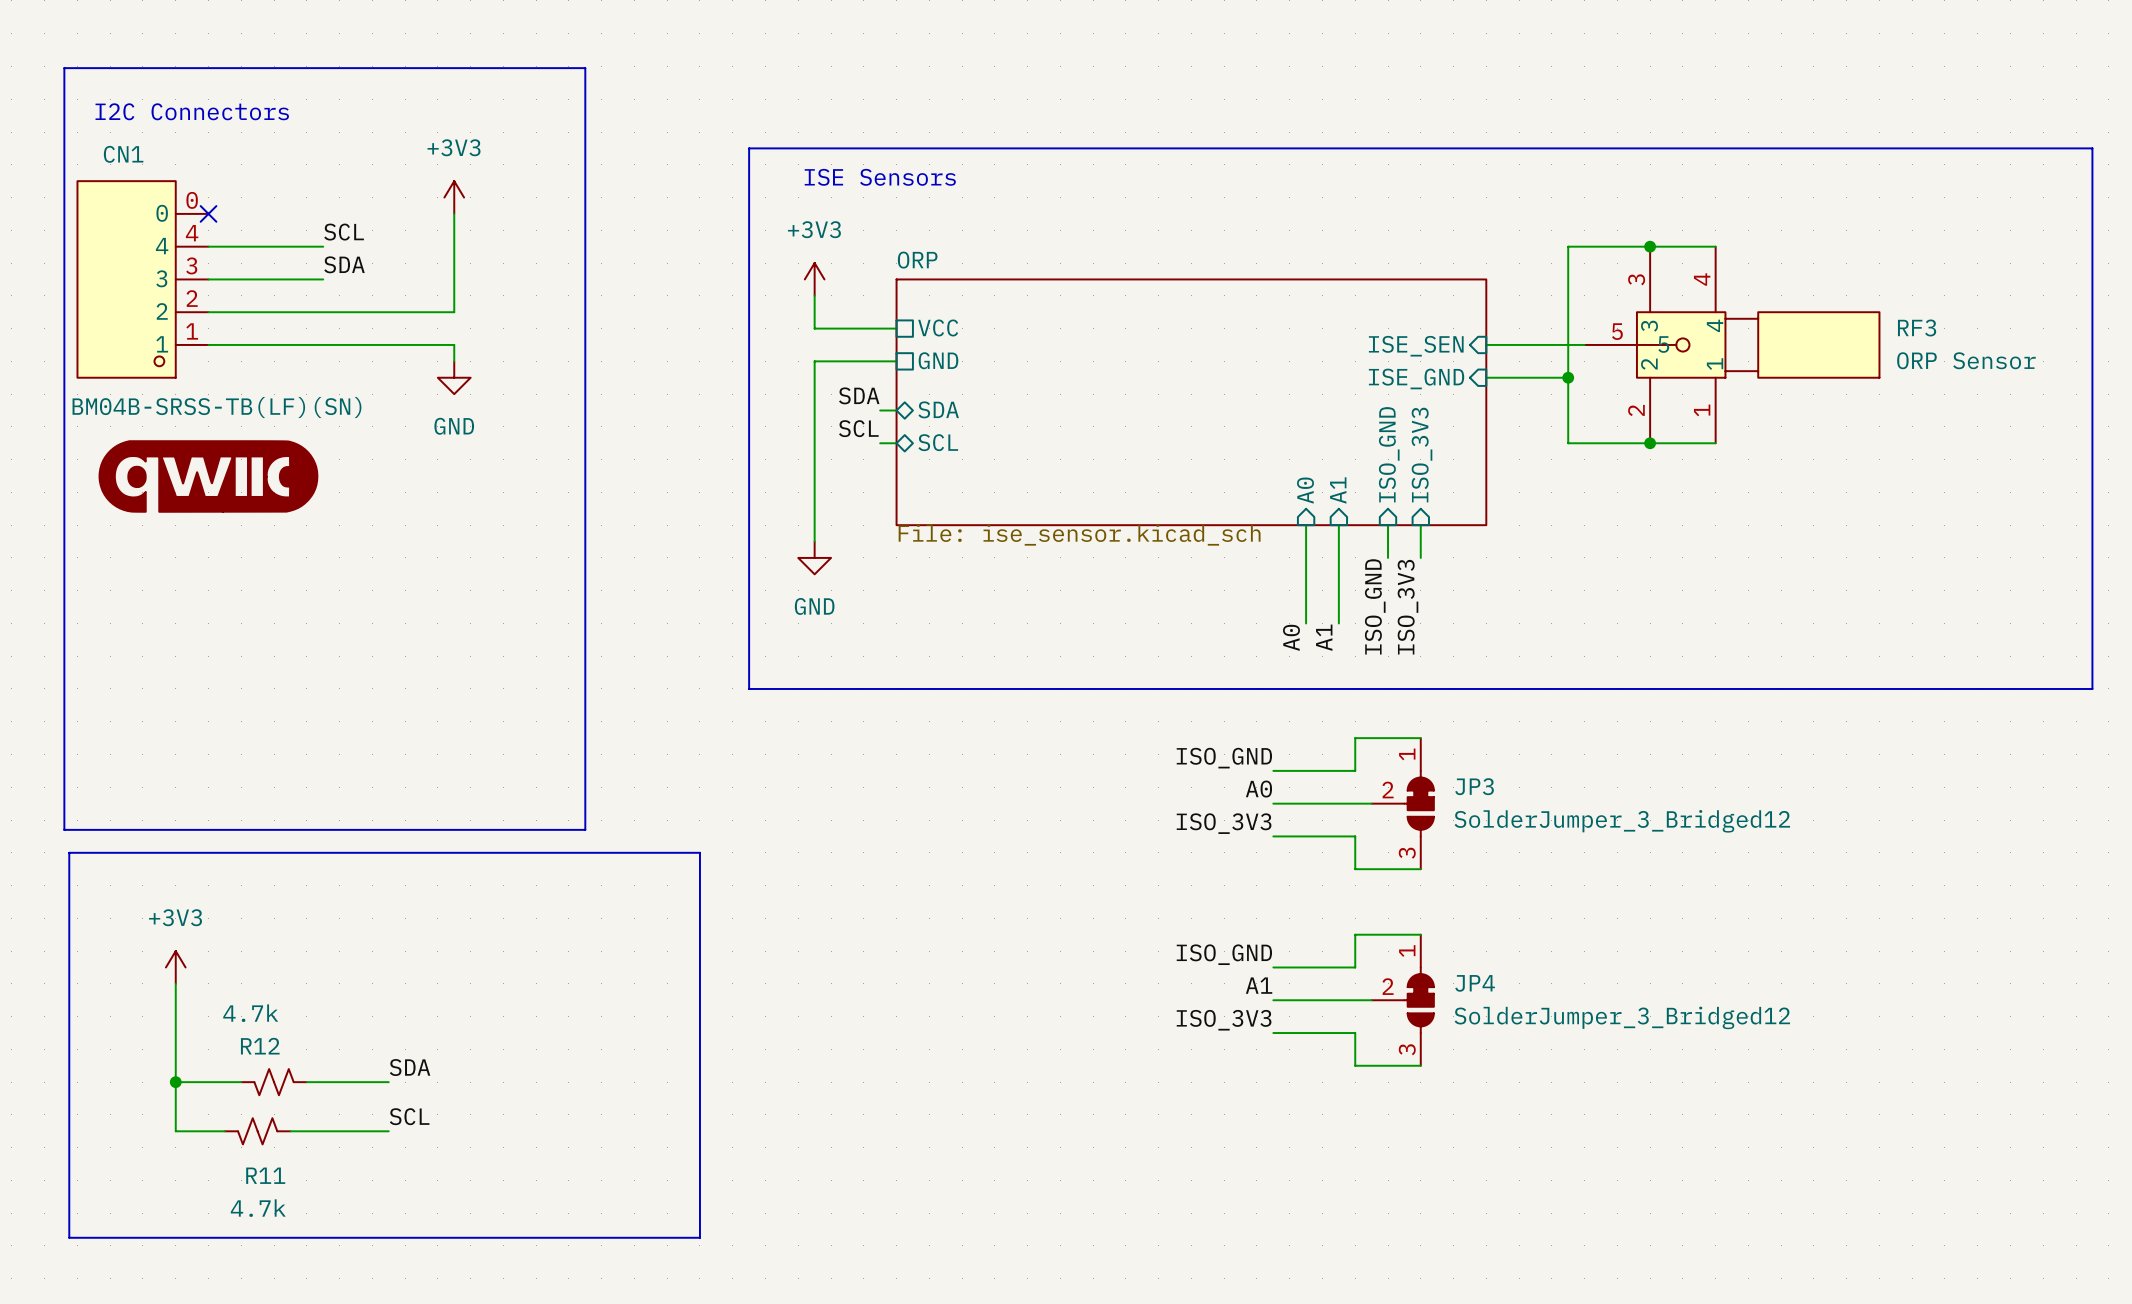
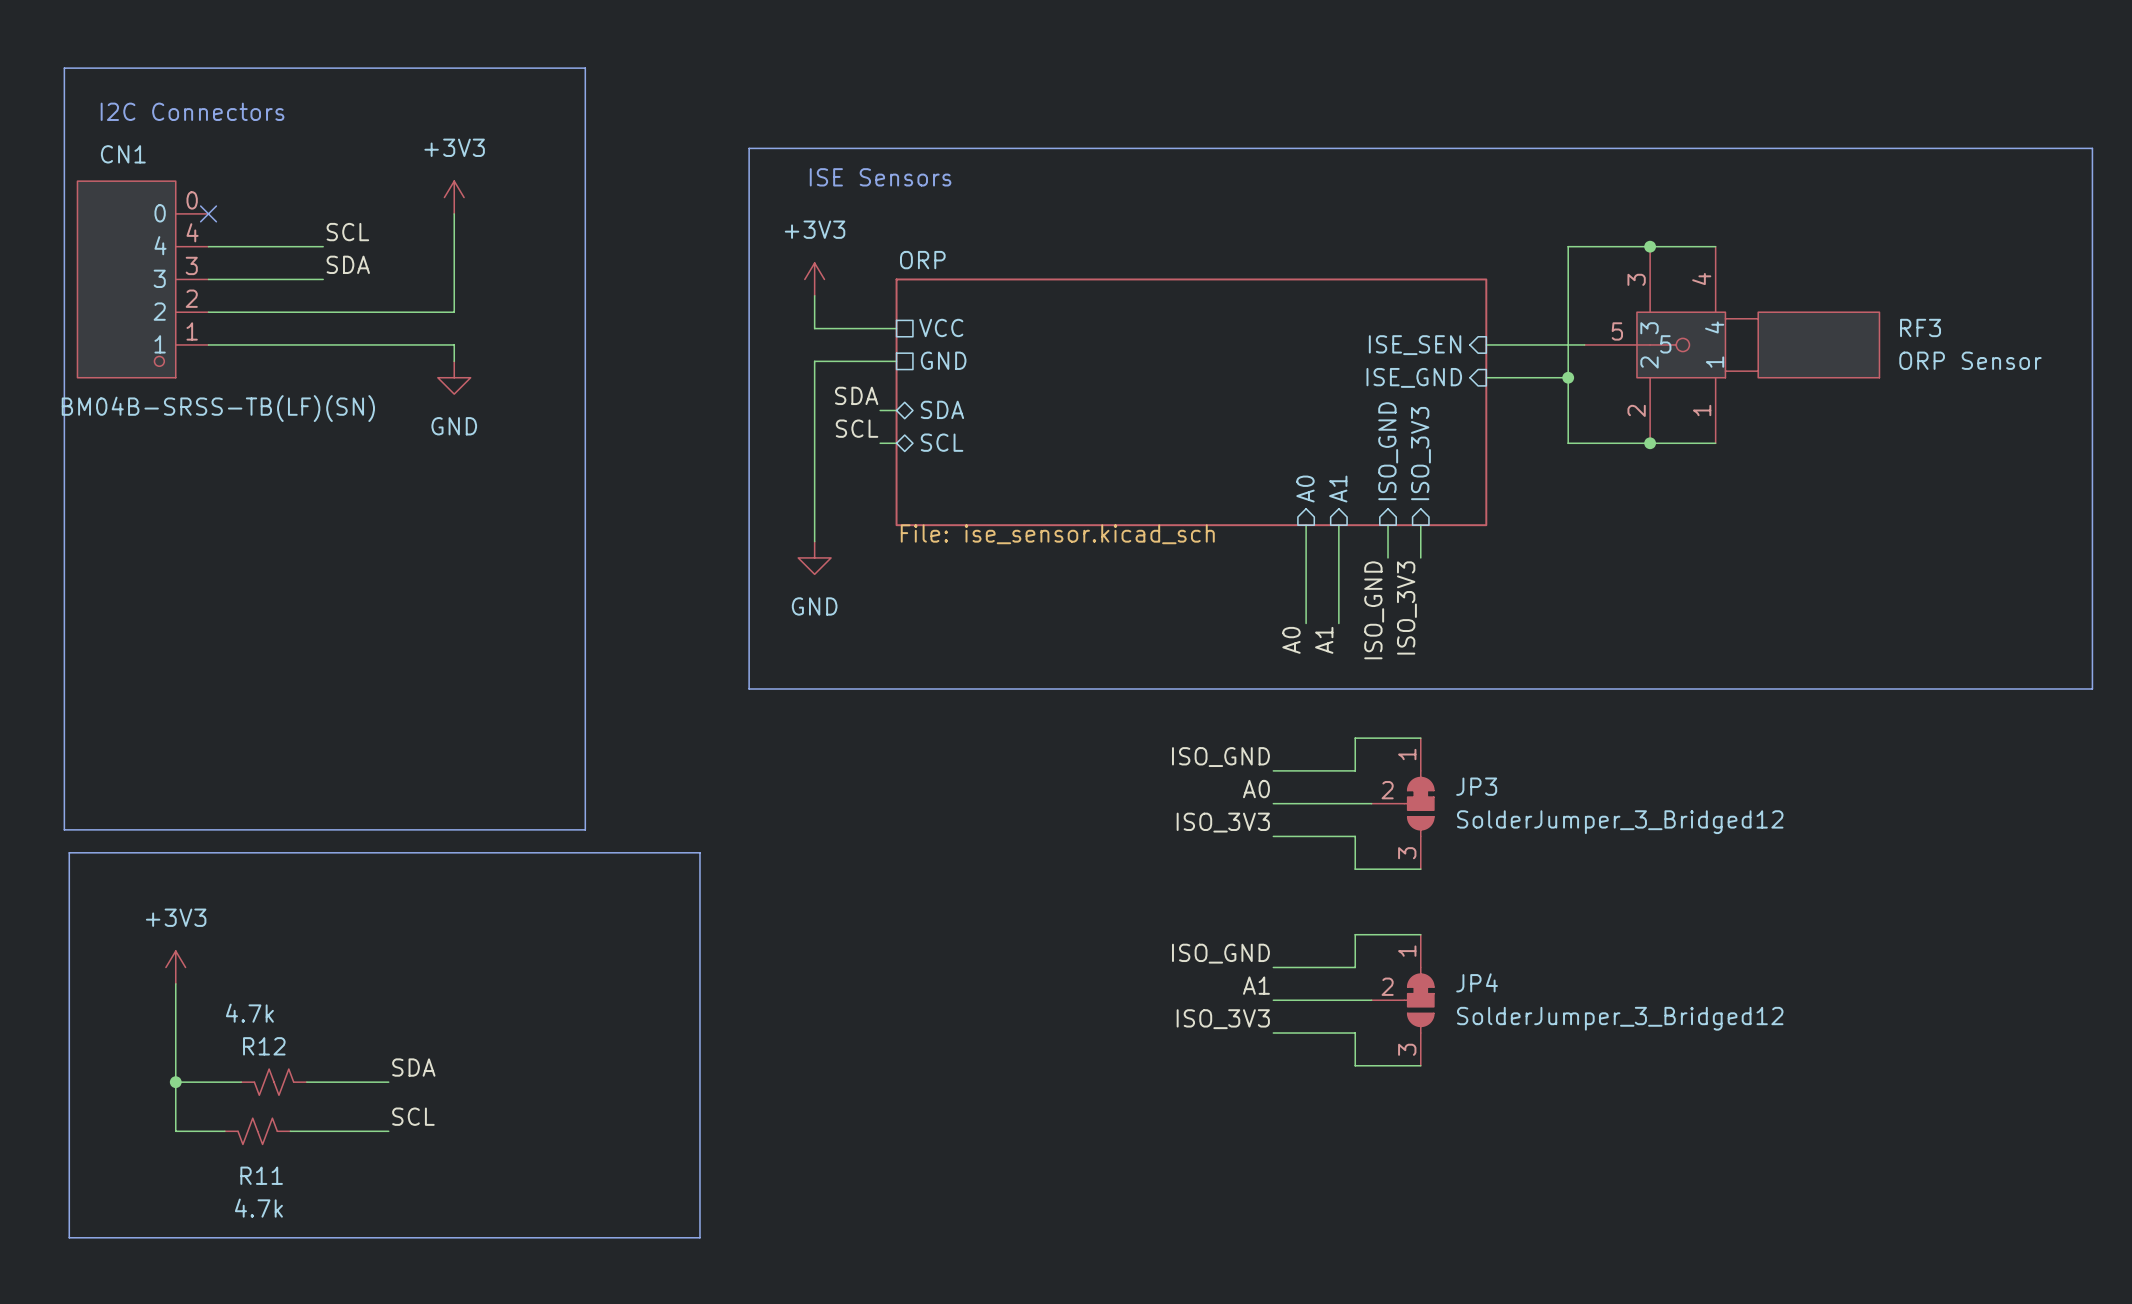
part: (208, 476) -> none

